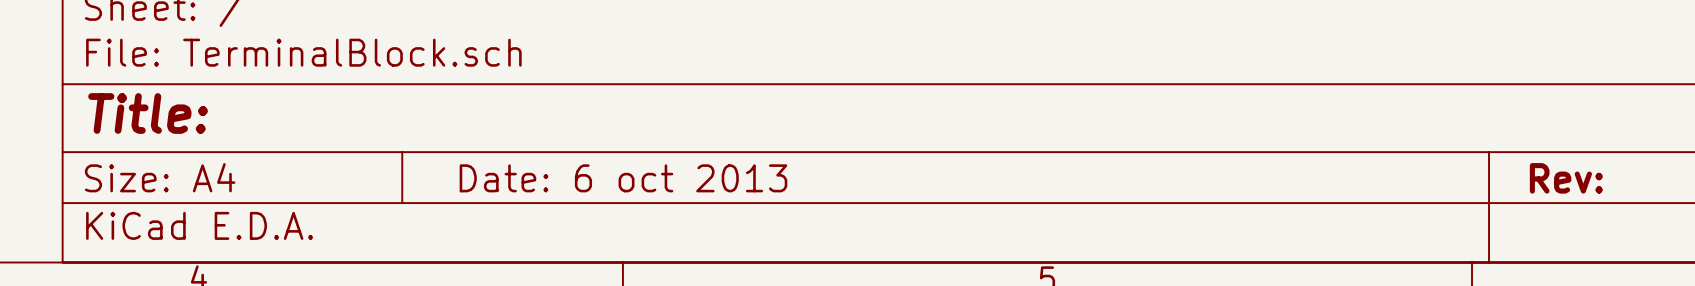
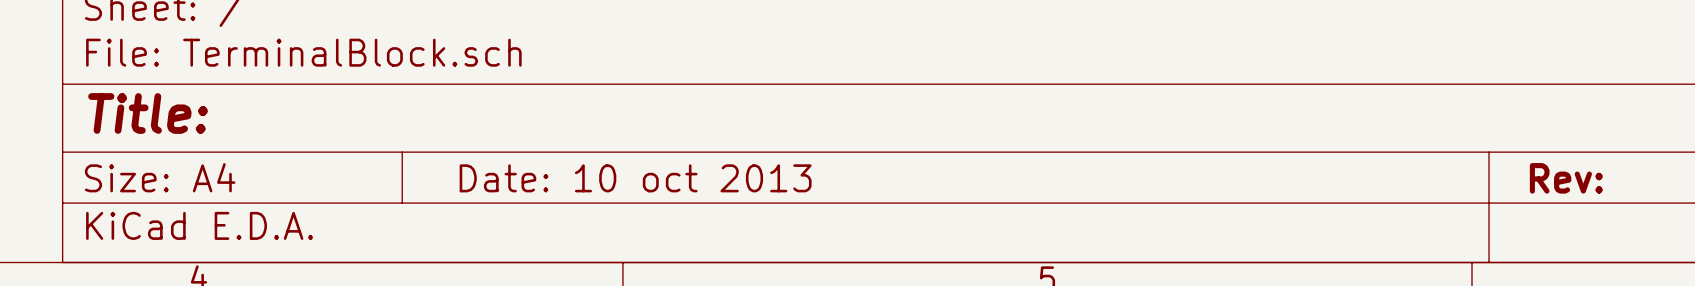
title block: Date: 6 oct 2013 (623, 178) -> Date: 10 oct 2013 (635, 178)

